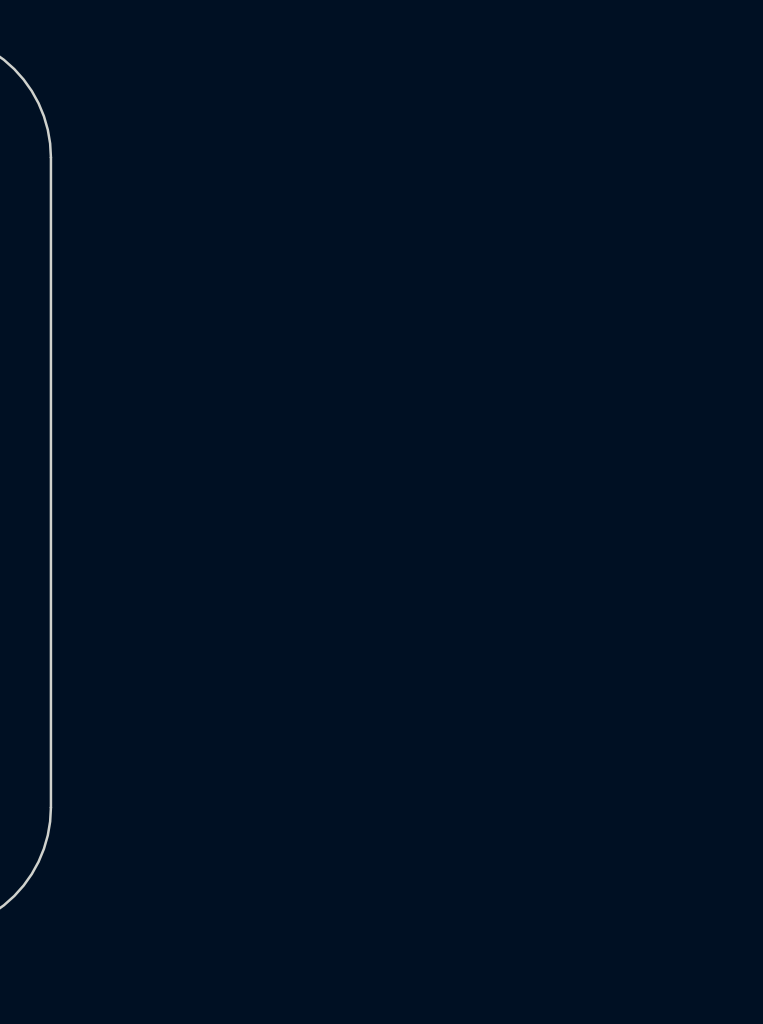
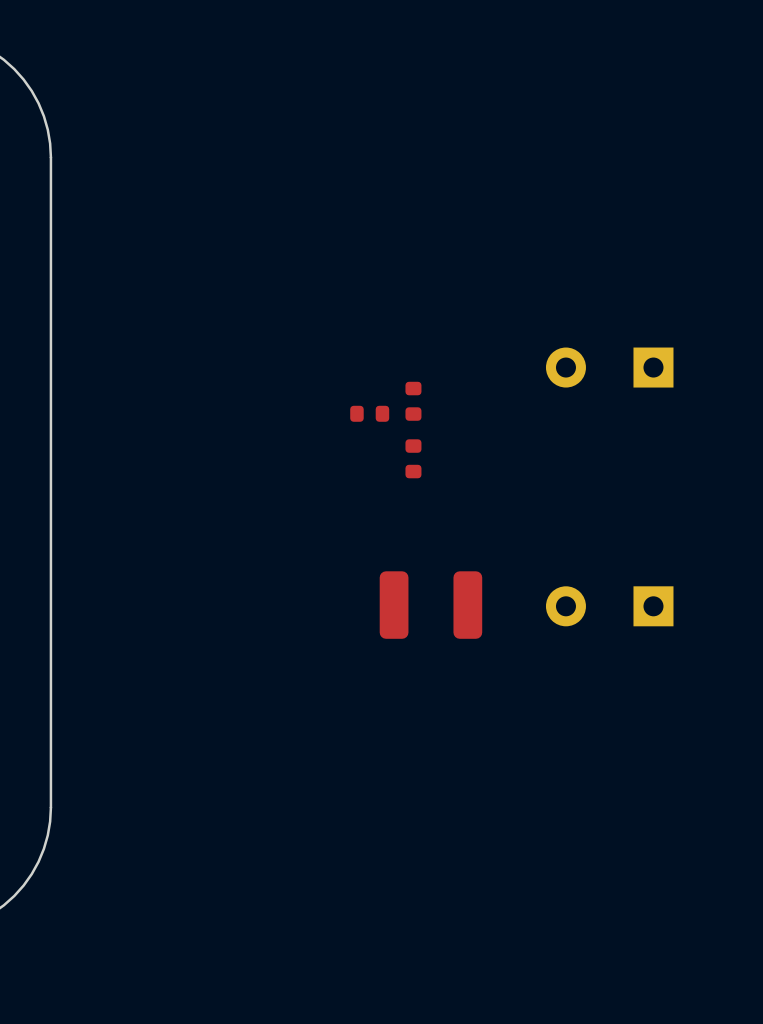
part: none -> (609, 367)
part: none -> (413, 401)
part: none -> (369, 413)
part: none -> (413, 458)
part: none -> (430, 605)
part: none -> (609, 606)

